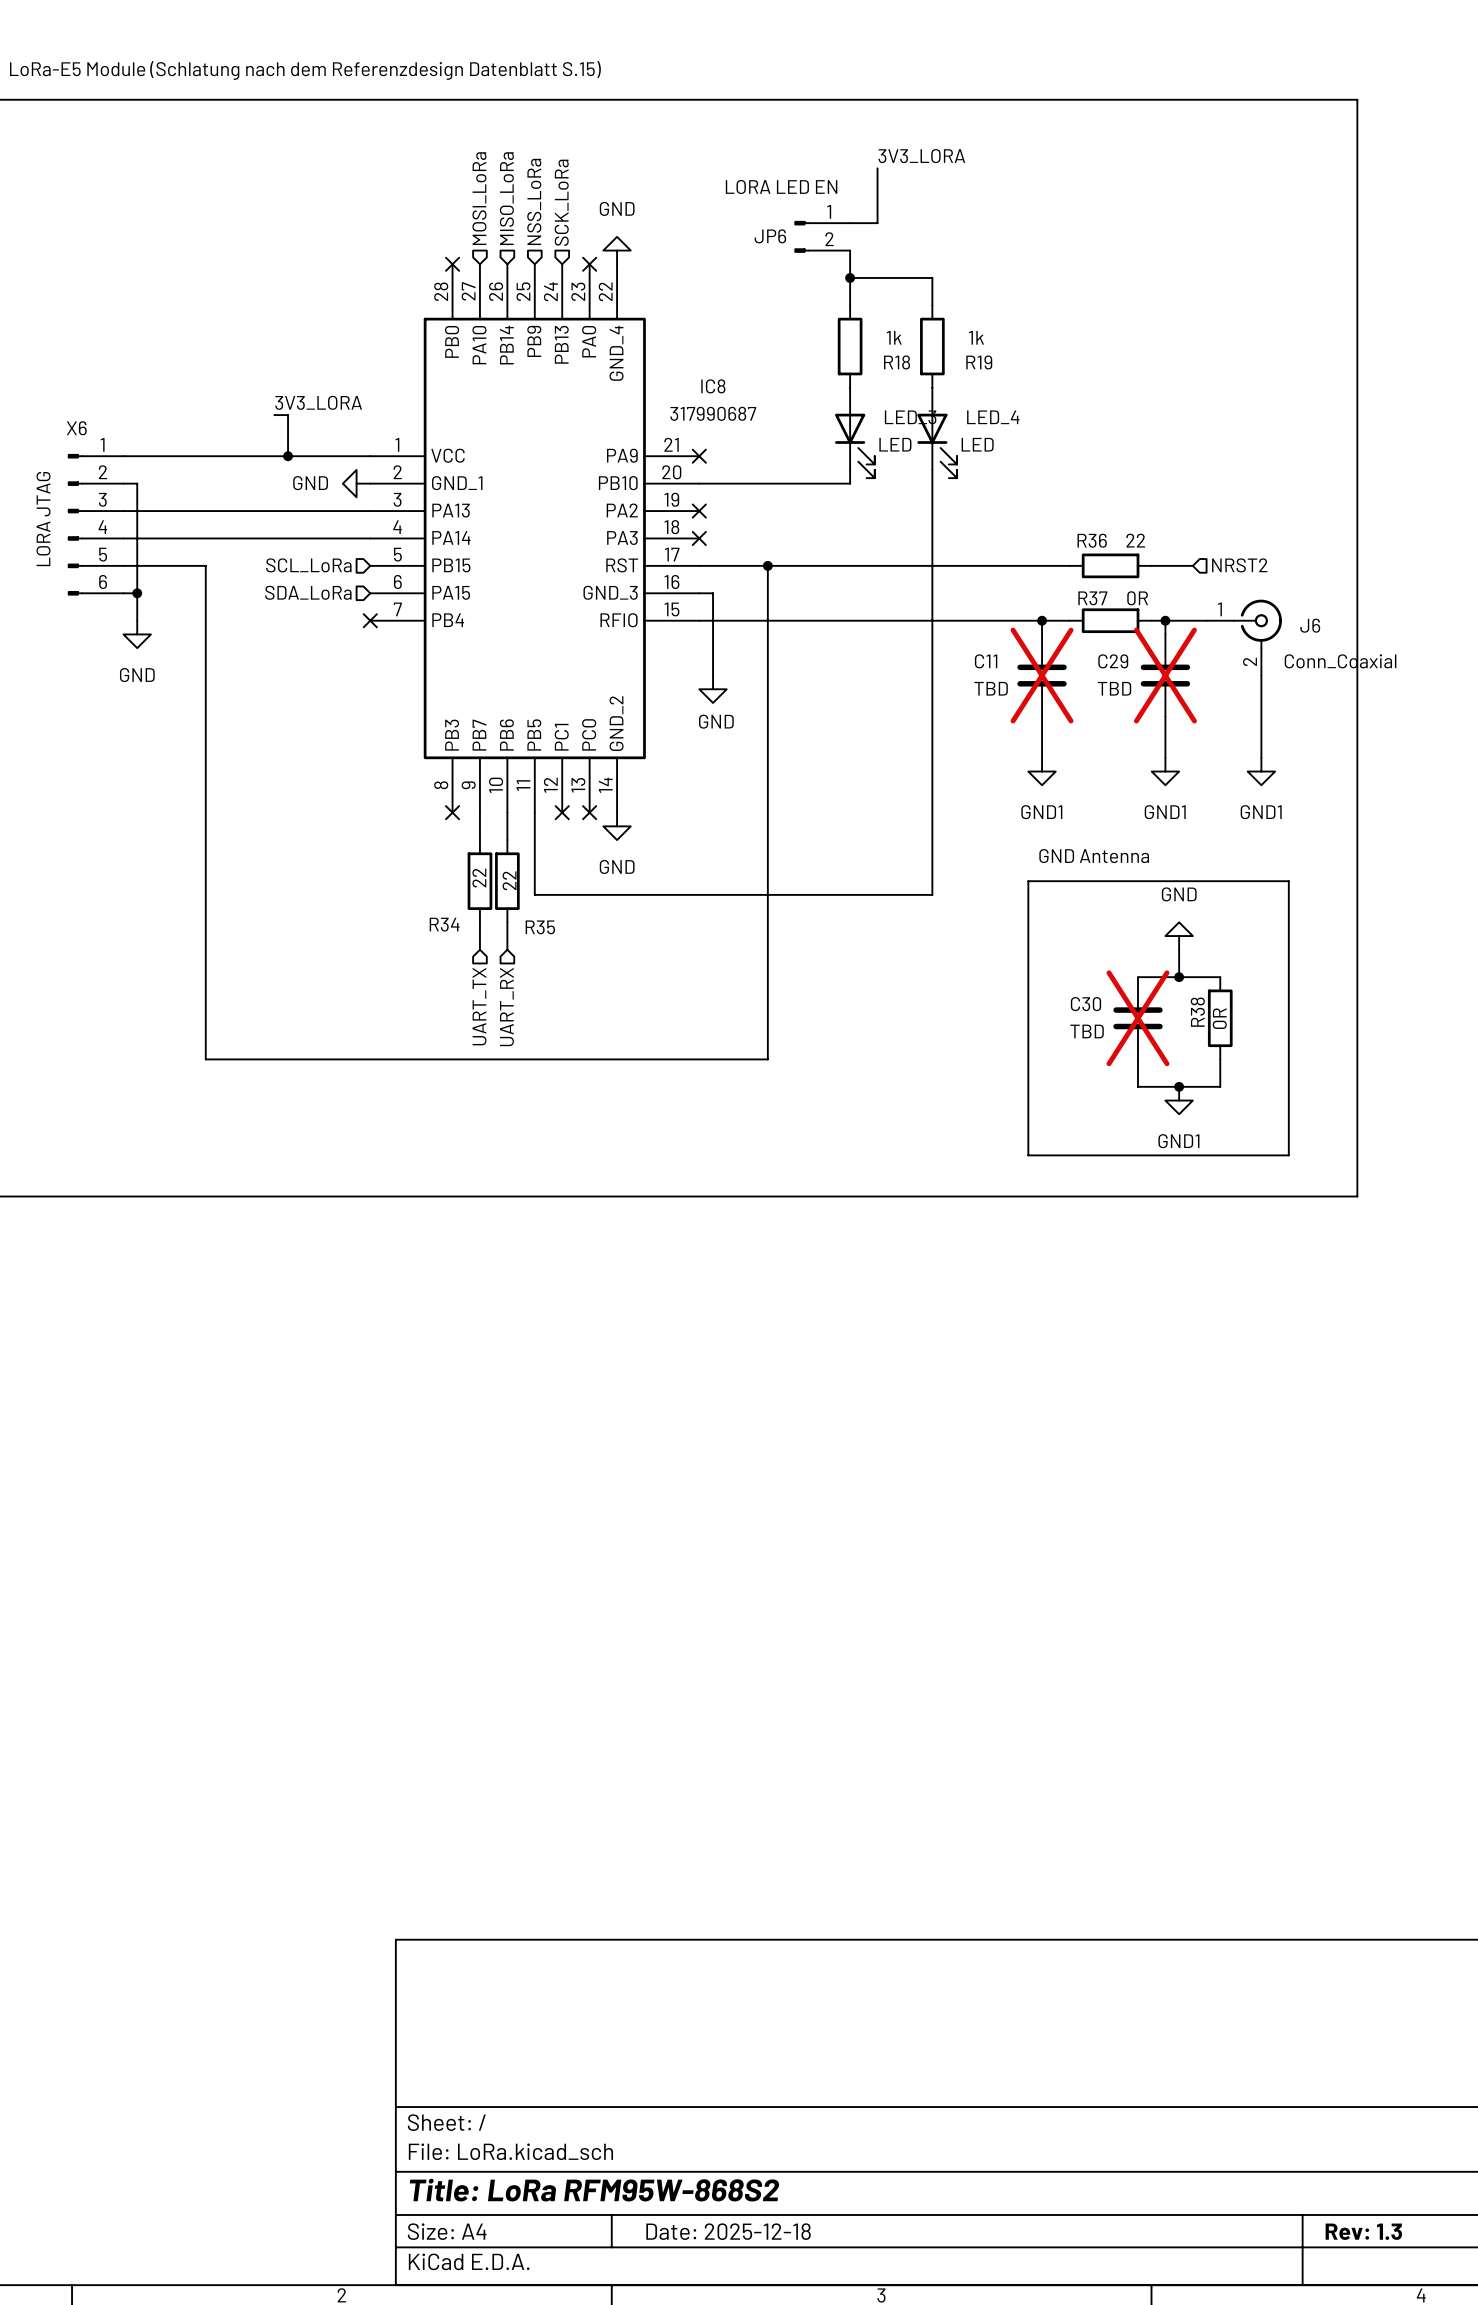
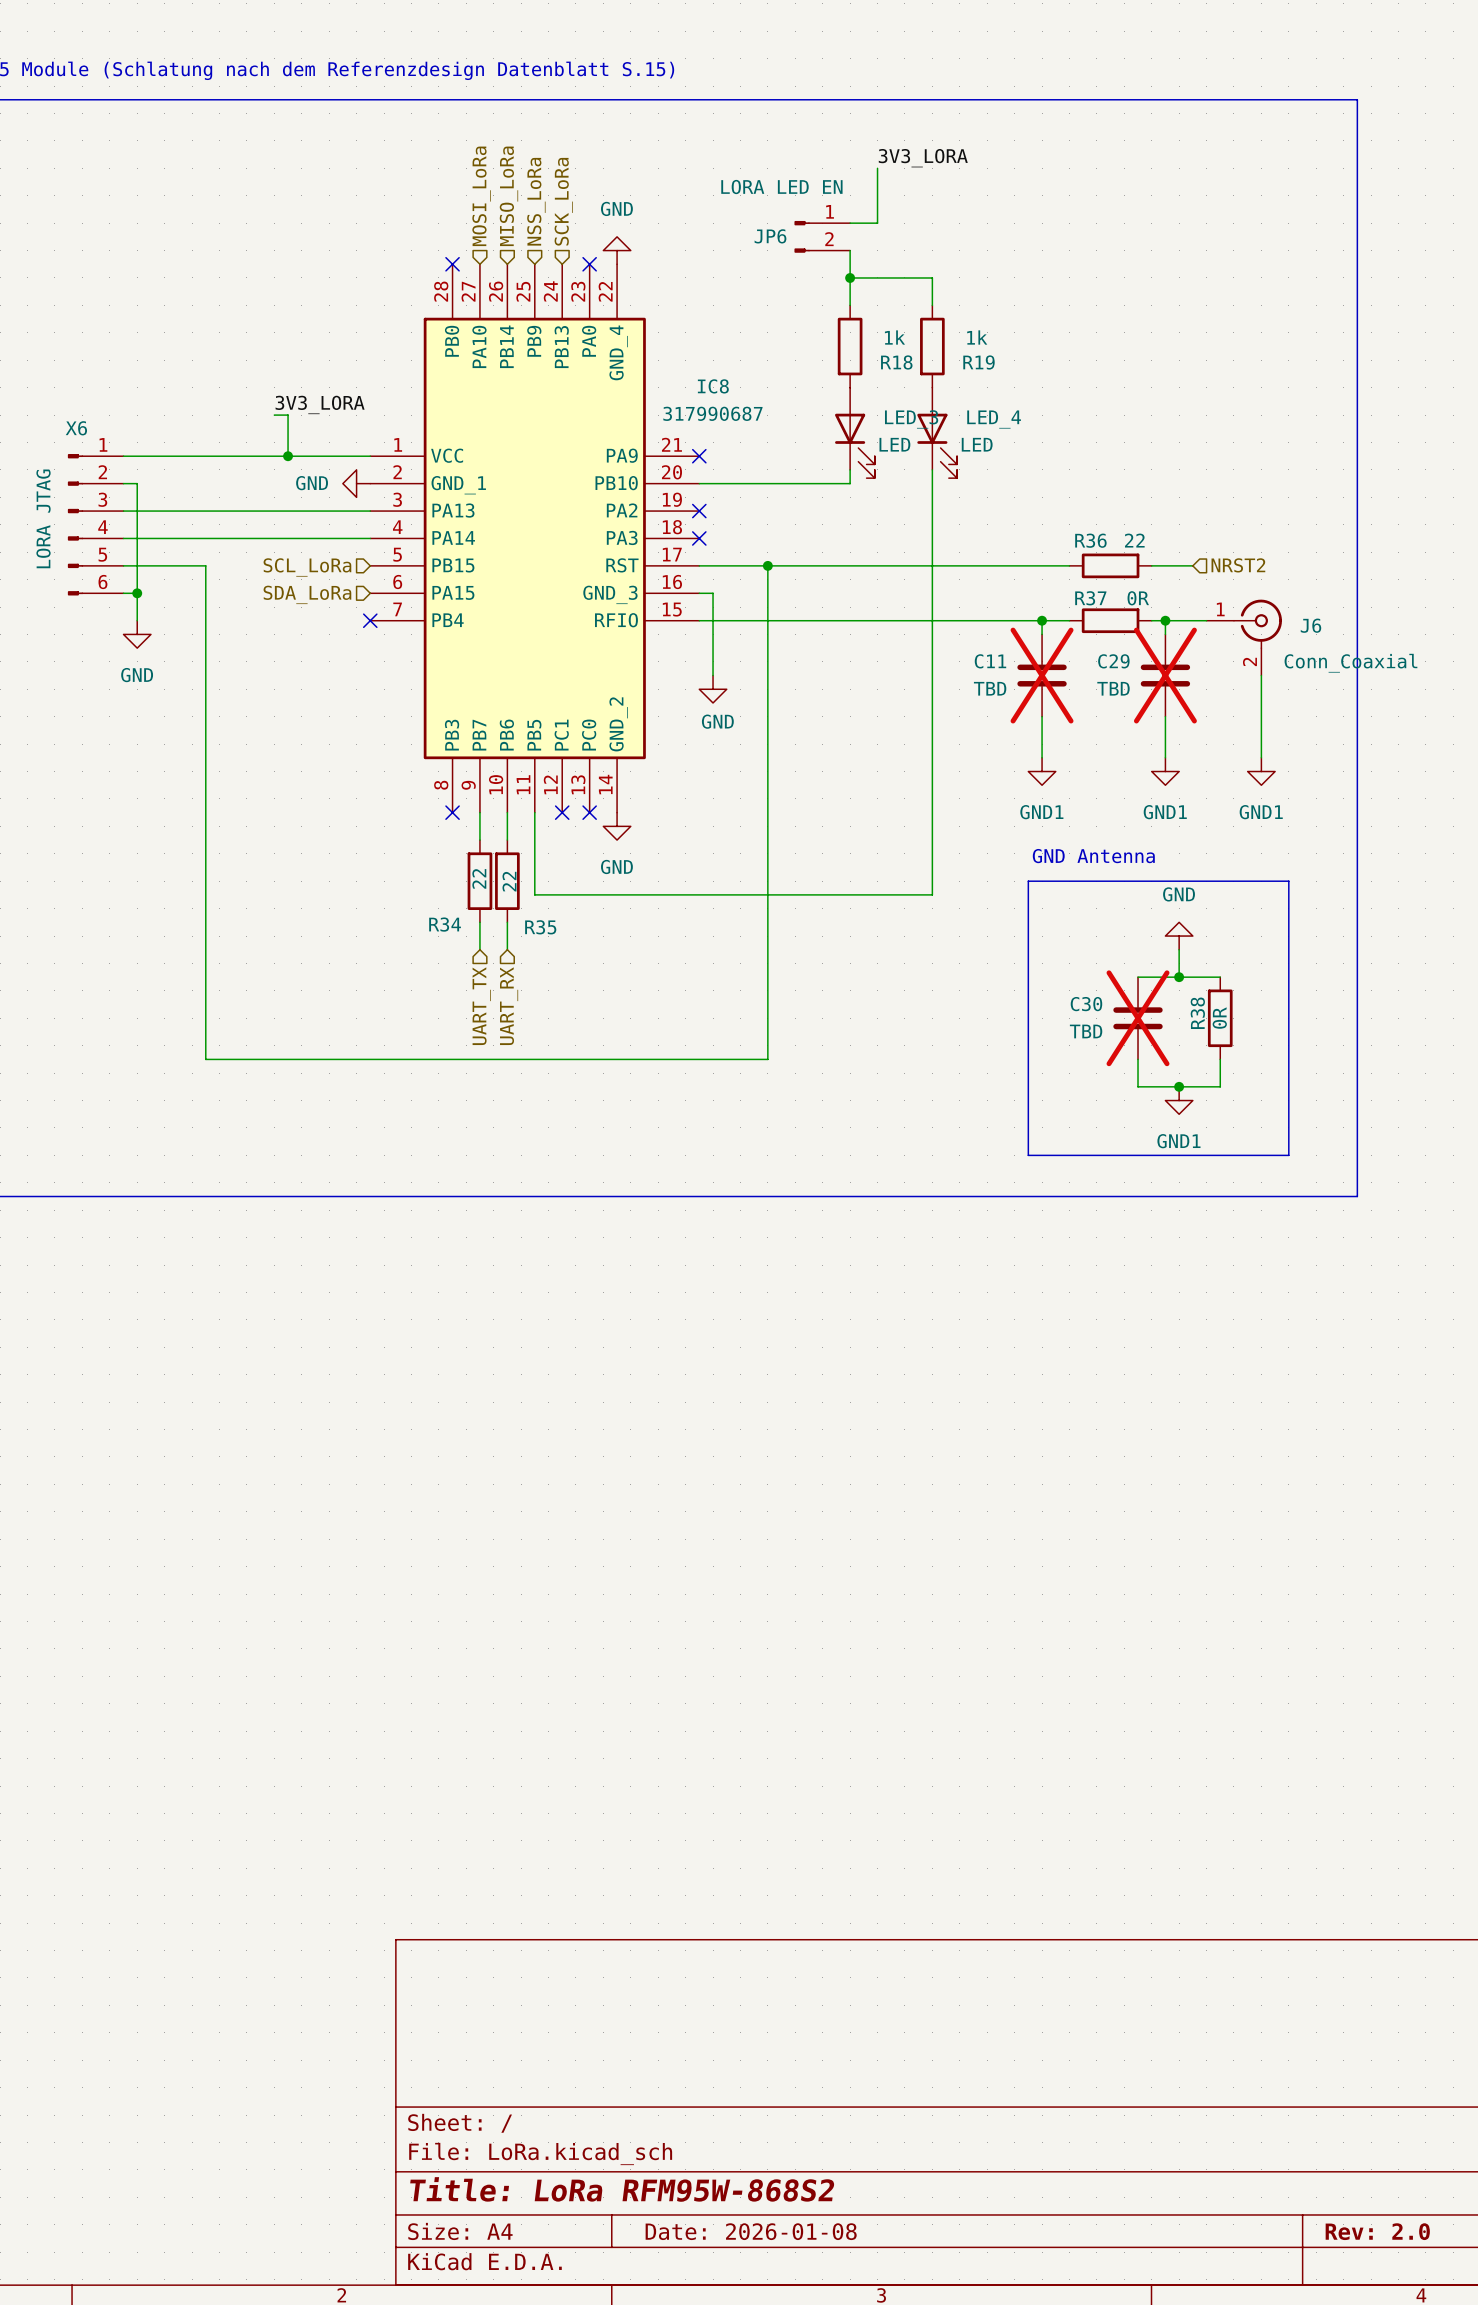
title block: Date: 2025-12-18 (728, 2231) -> Date: 2026-01-08 (751, 2231)
title block: Rev: 1.3 (1363, 2231) -> Rev: 2.0 (1377, 2231)

